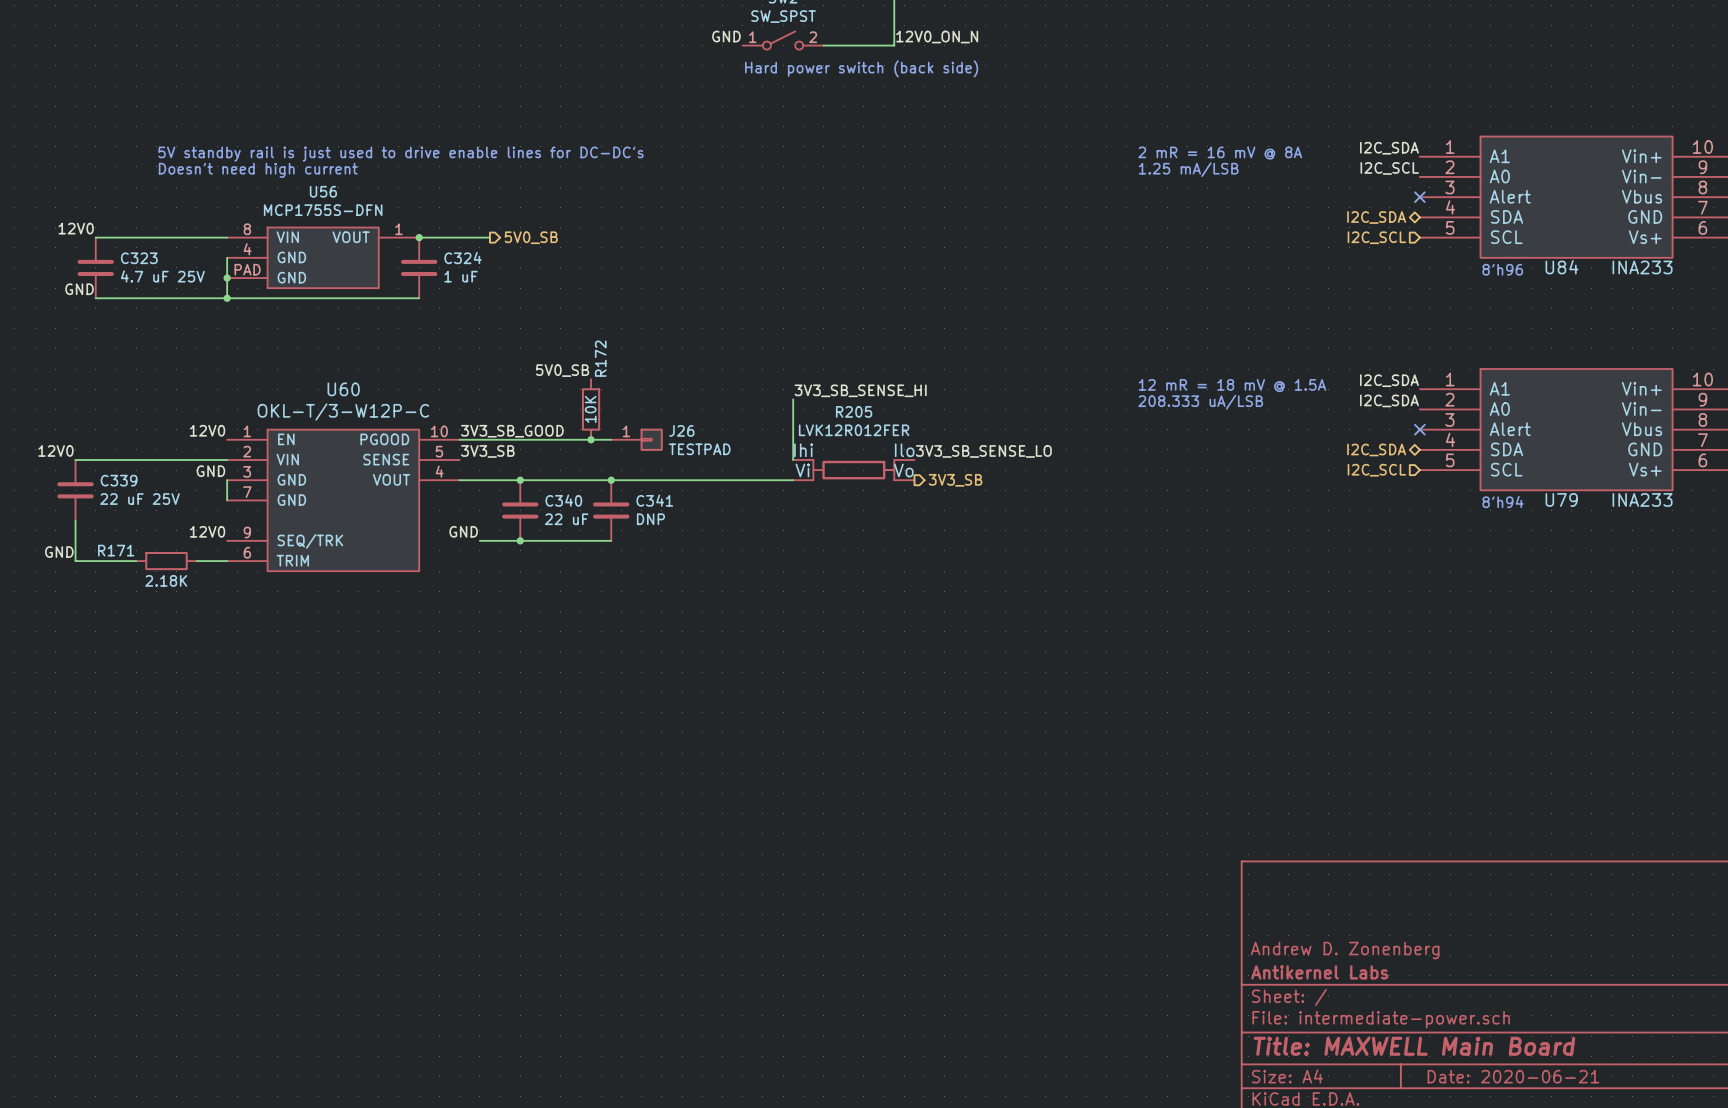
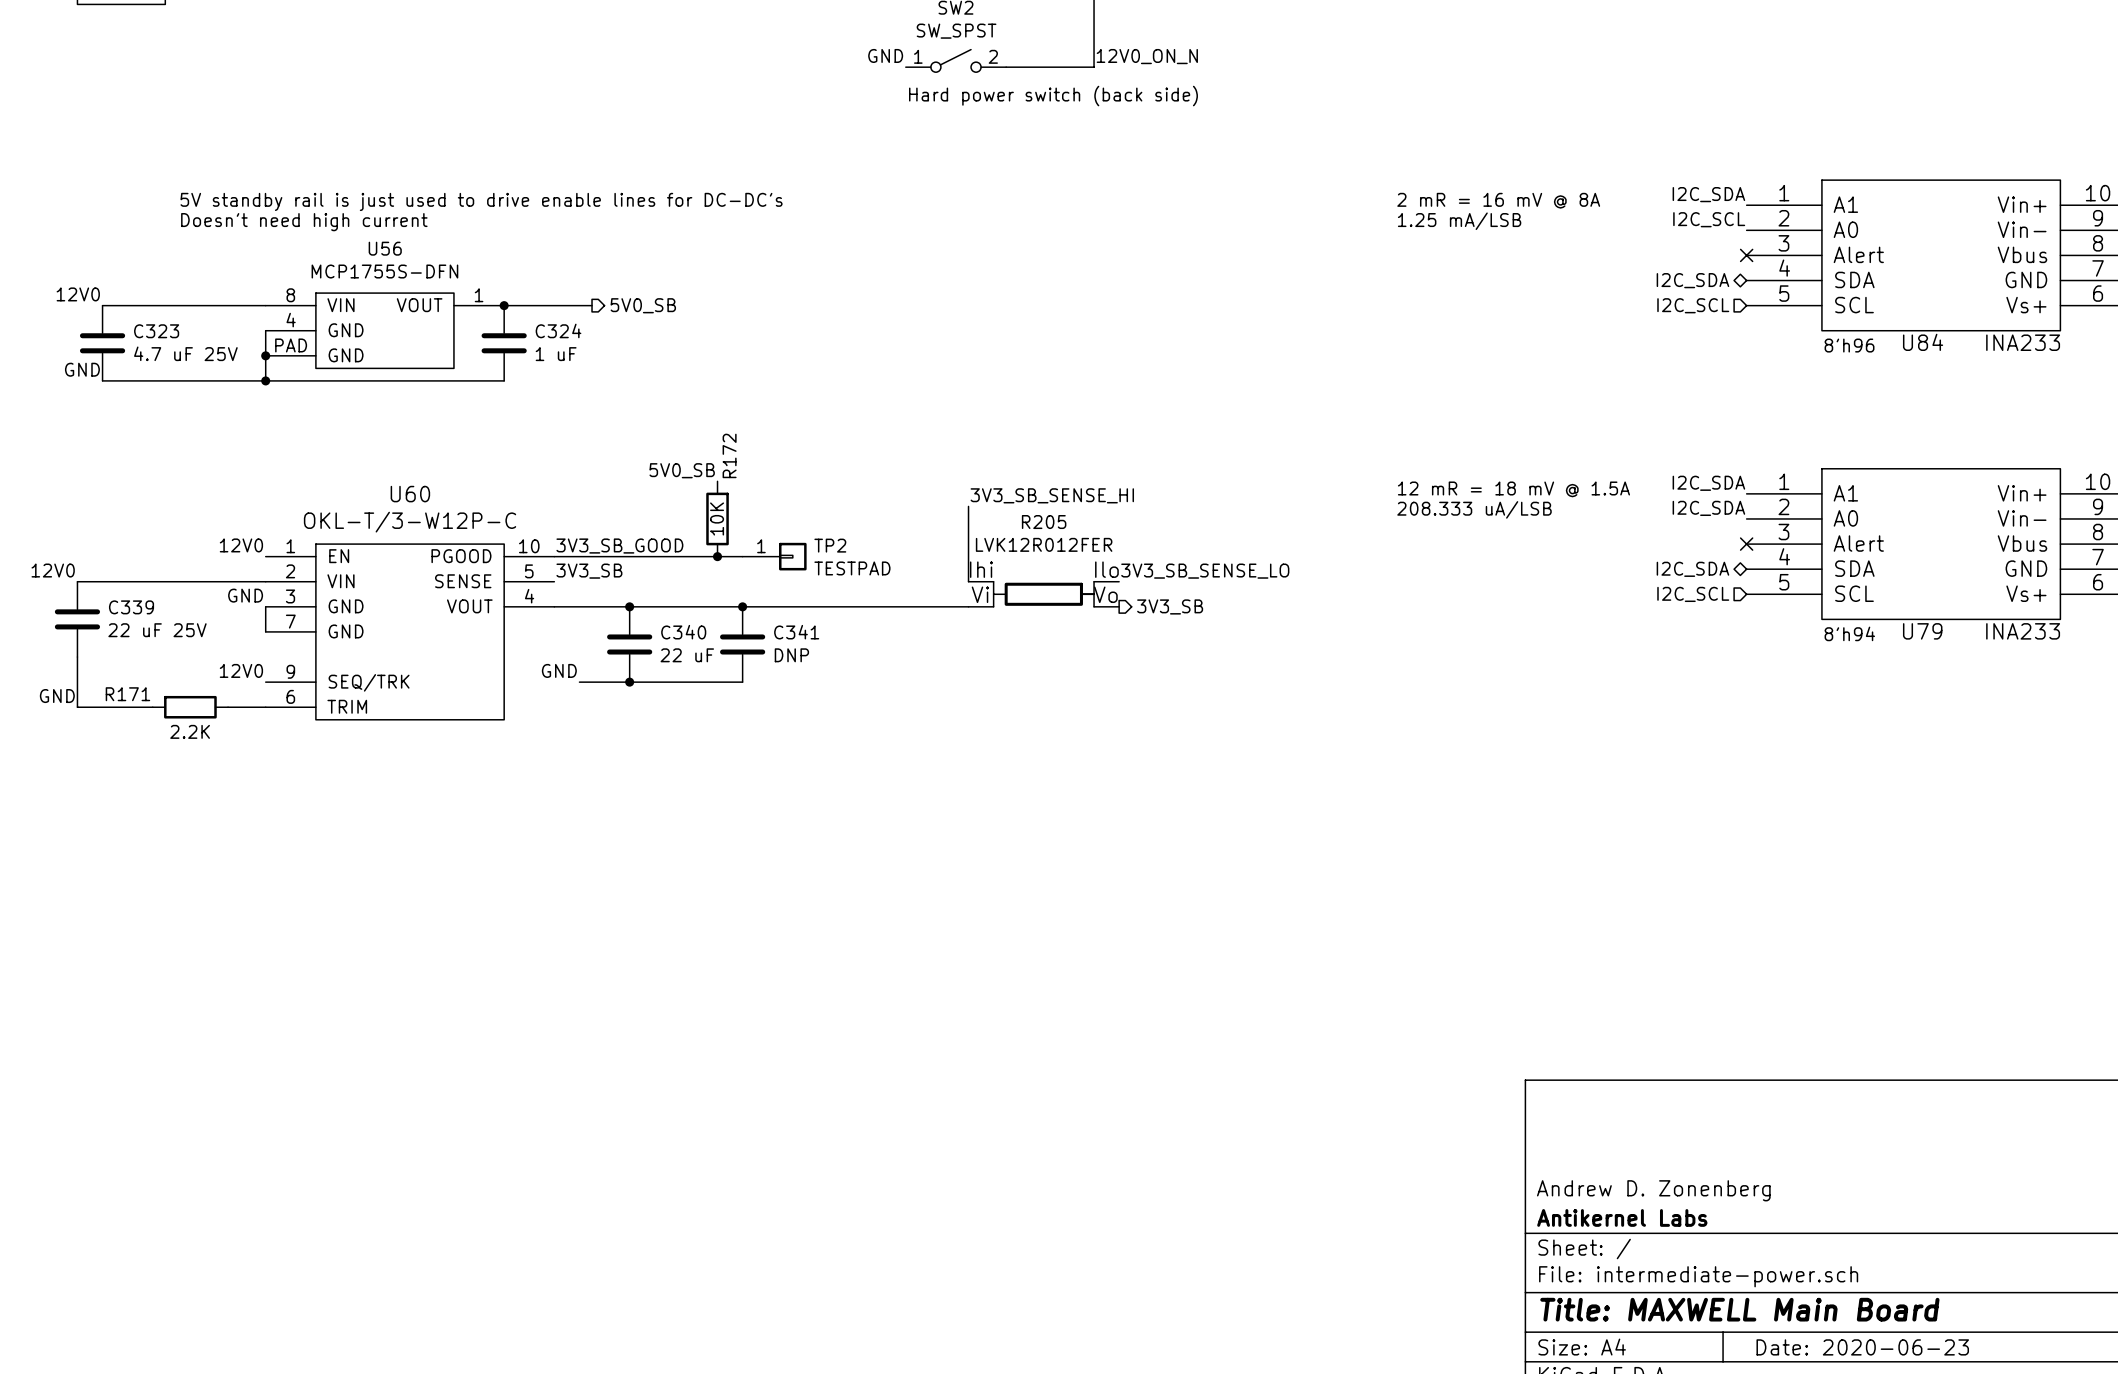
J26 name: J26 (681, 430) -> TP2 (830, 545)
R171 value: 2.18K (166, 580) -> 2.2K (190, 731)
title block: Date: 2020-06-21 (1513, 1076) -> Date: 2020-06-23 (1862, 1347)

